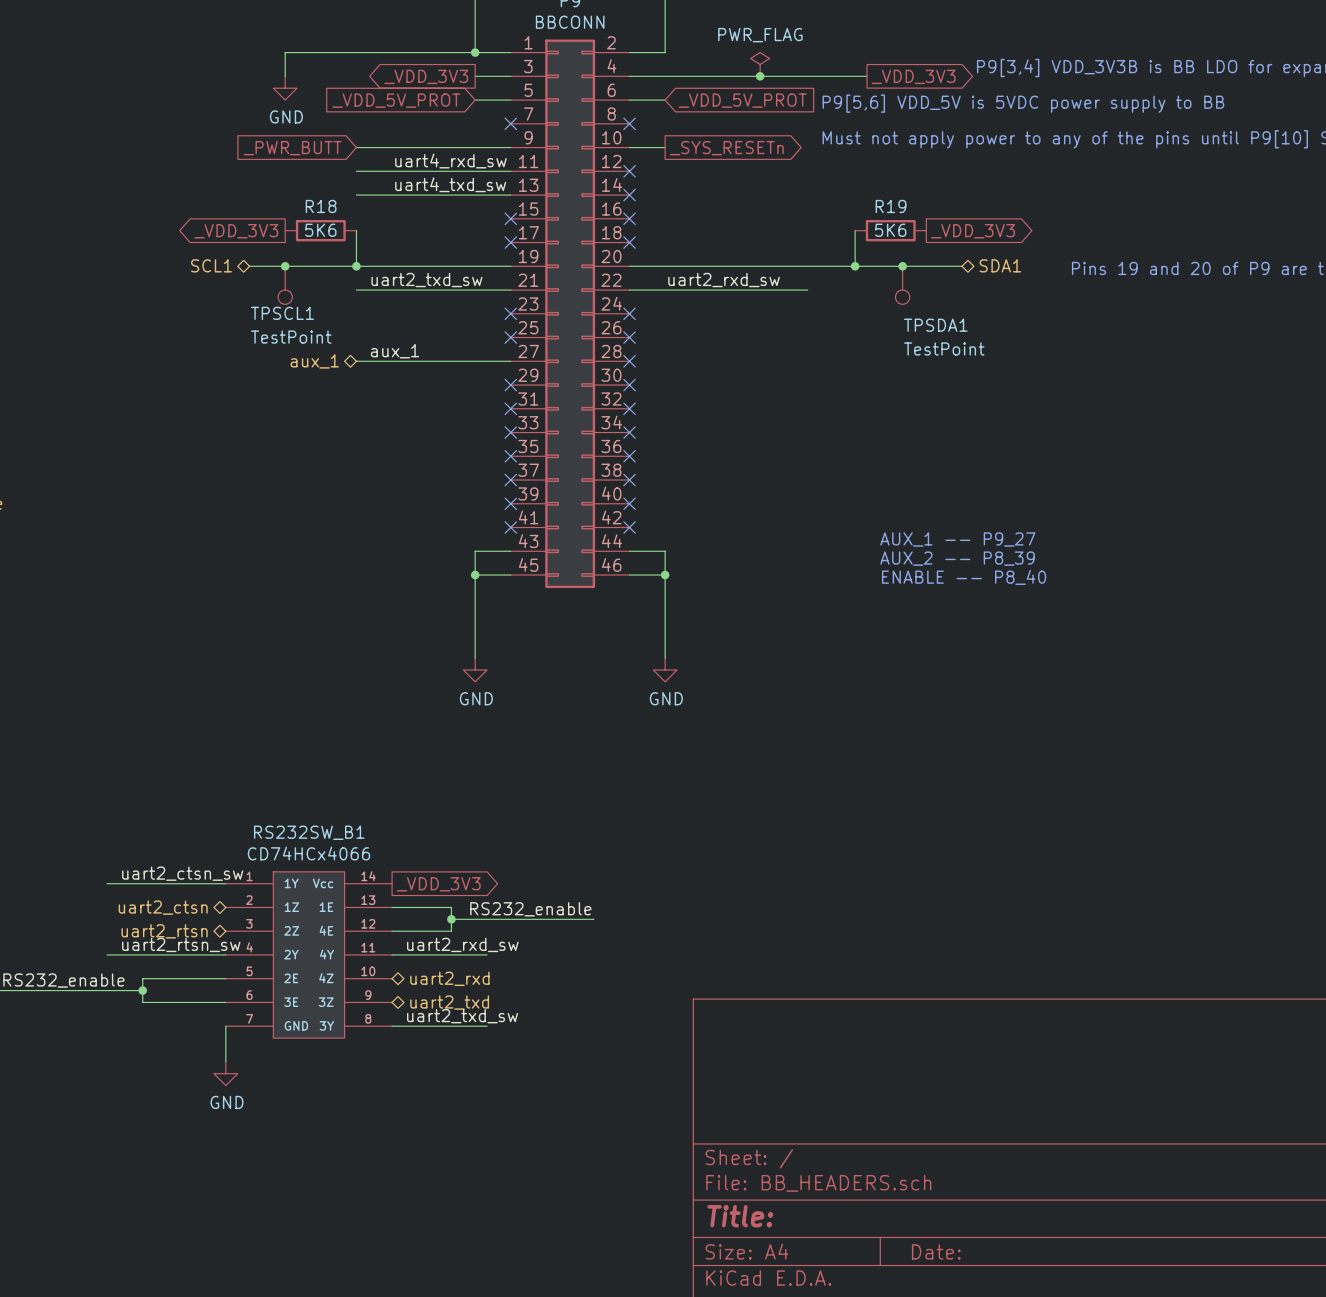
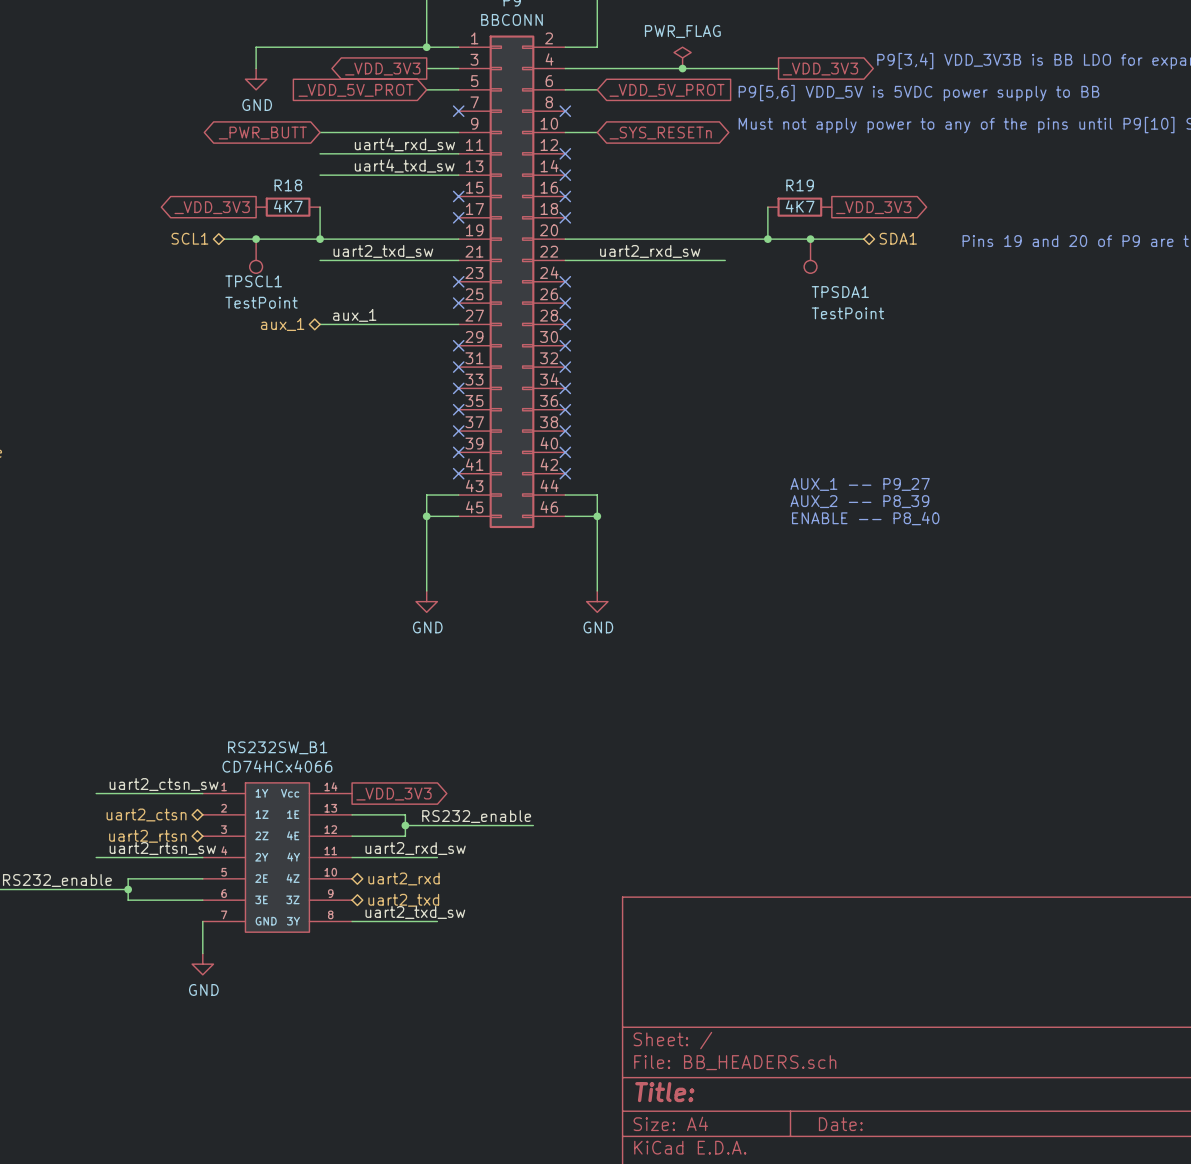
global label shape: input (292, 148) -> bidirectional (262, 133)
global label shape: output (726, 148) -> bidirectional (660, 133)
R18 value: 5K6 (320, 230) -> 4K7 (288, 206)
R19 value: 5K6 (890, 230) -> 4K7 (800, 206)

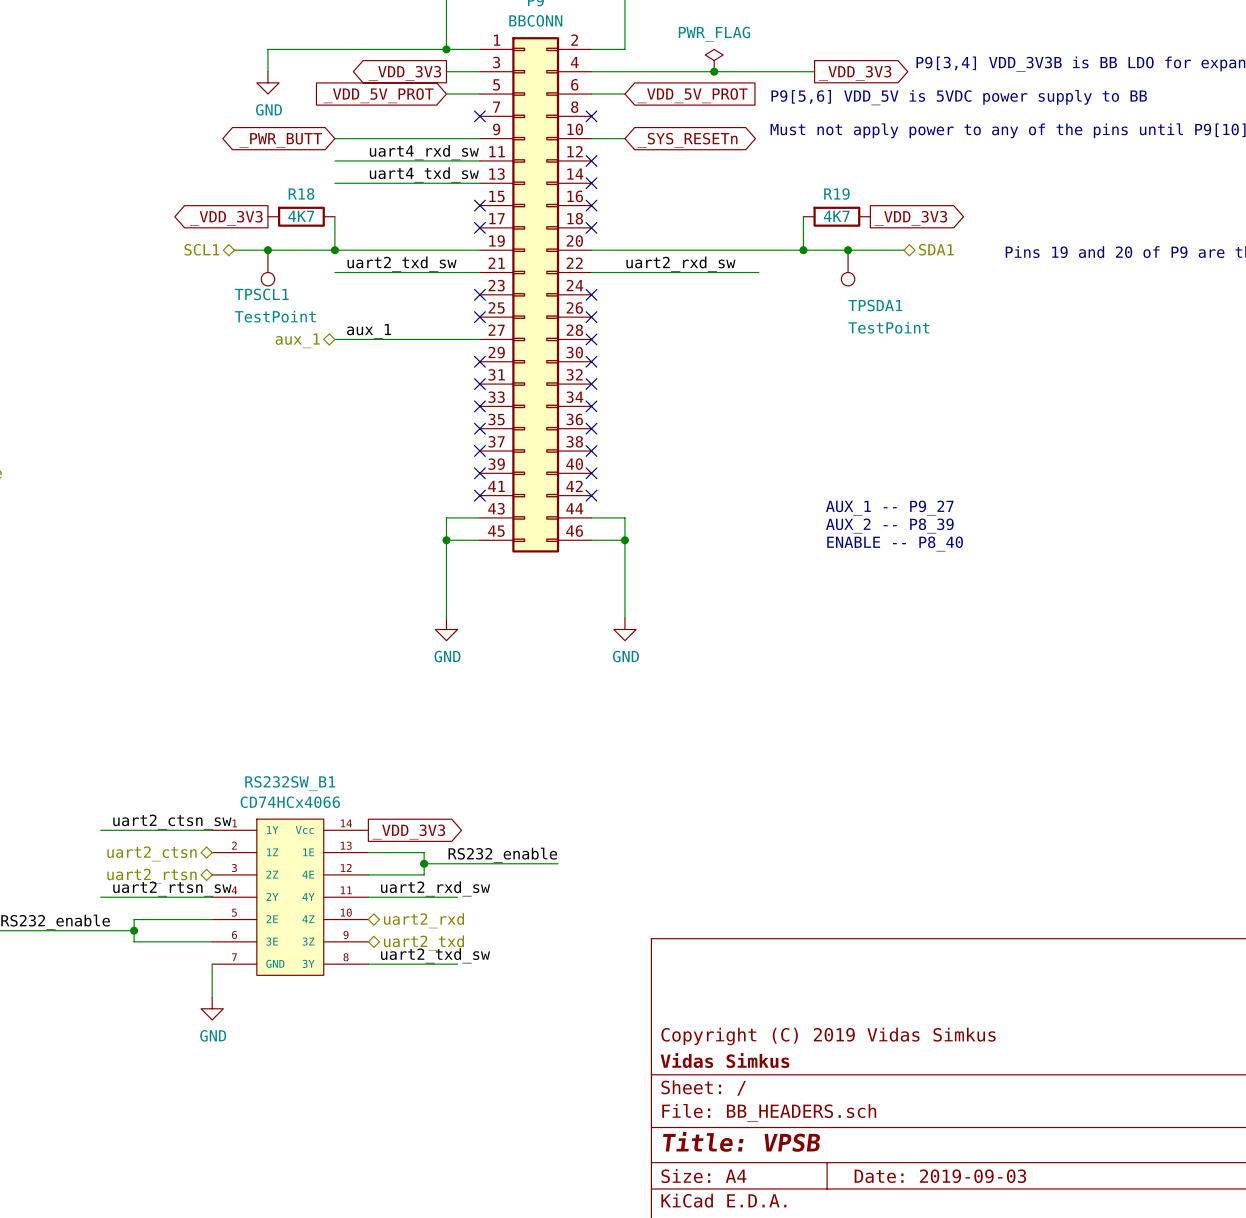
title block: none -> Copyright (C) 2019 Vidas Simkus (828, 1036)
title block: none -> Vidas Simkus (724, 1060)
title block: Title: (664, 1092) -> Title: VPSB (741, 1141)
title block: Date: (840, 1124) -> Date: 2019-09-03 (940, 1176)

